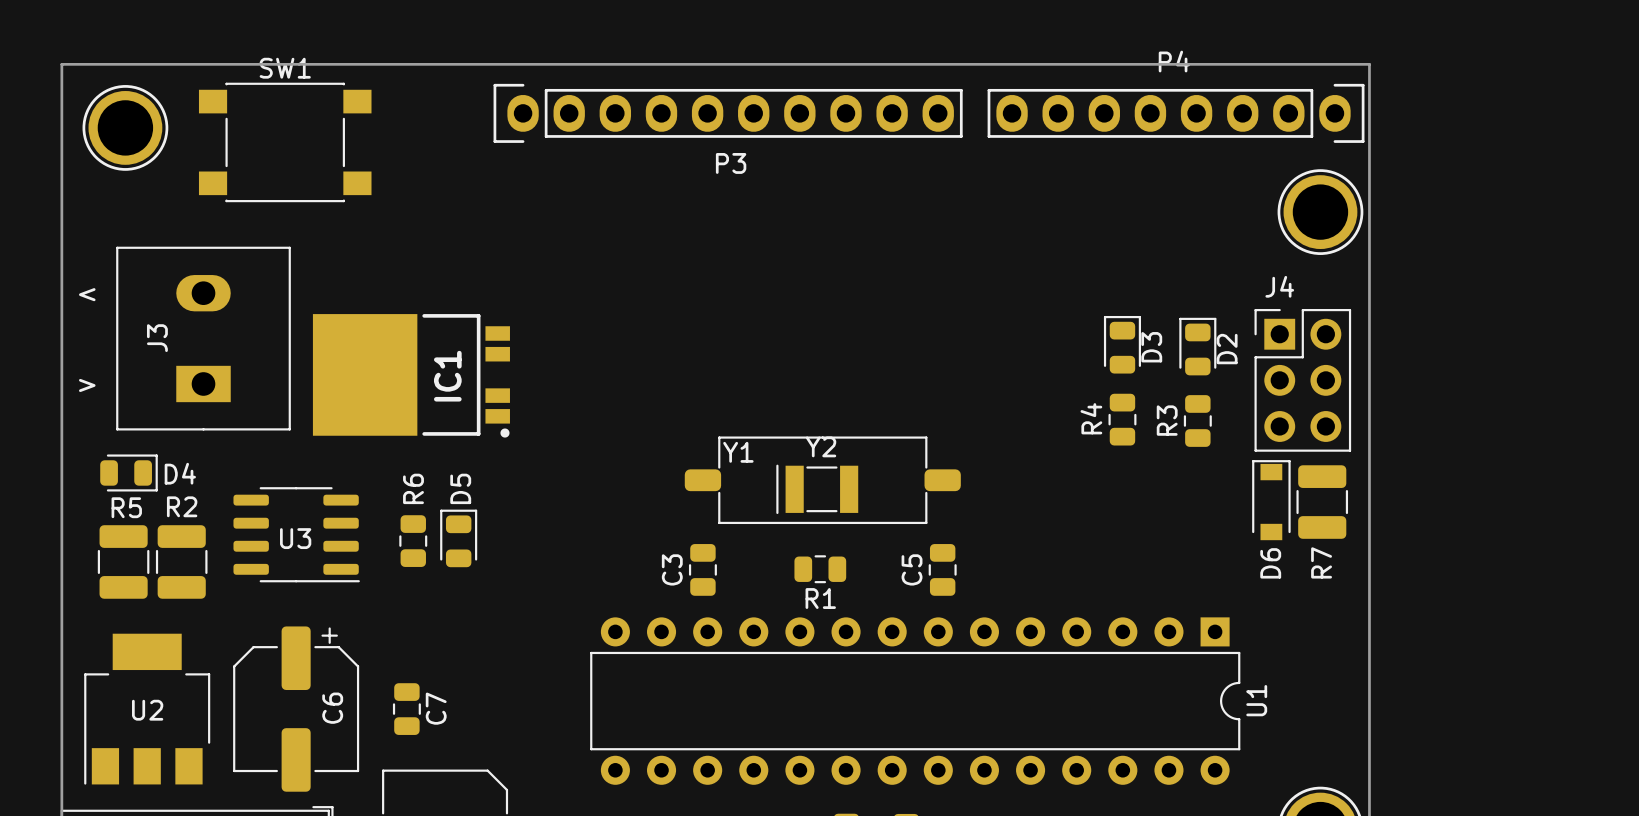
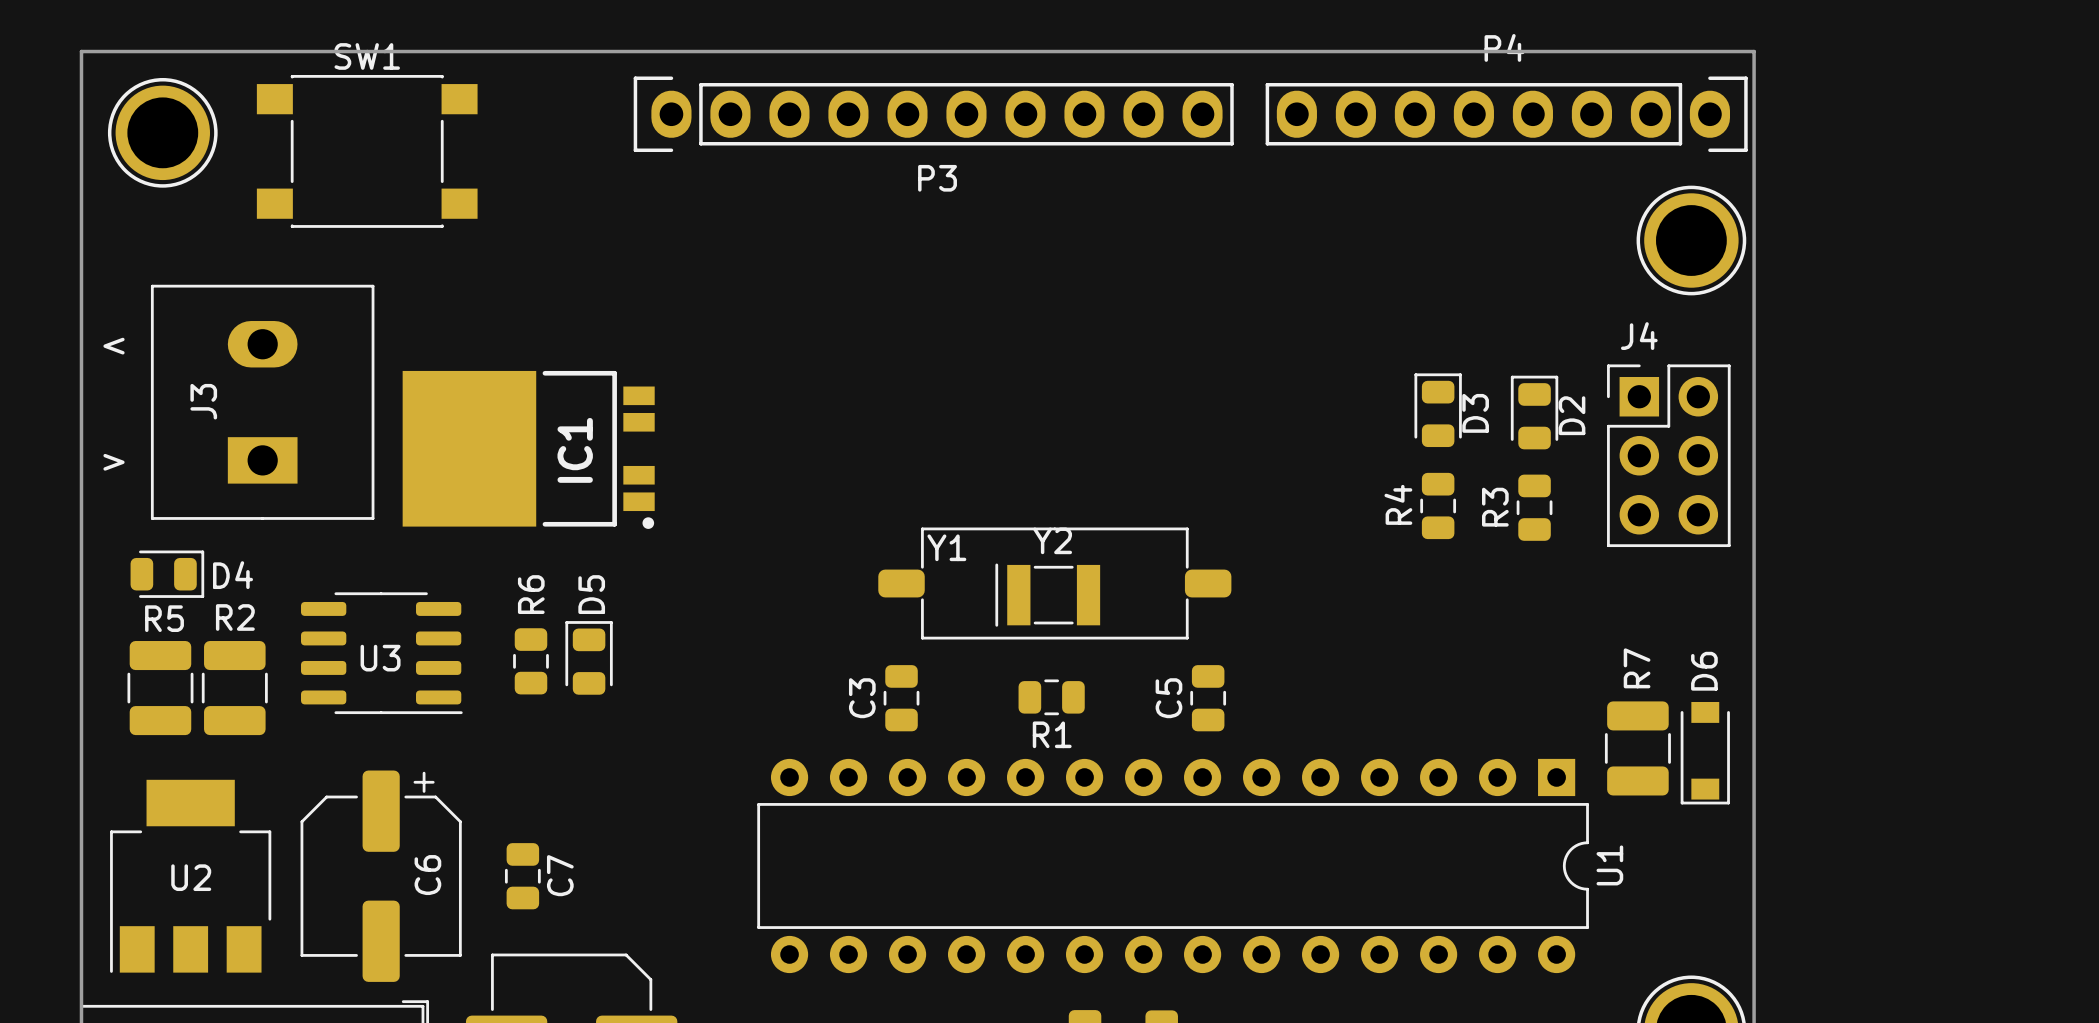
D6 rotation: 0° (1271, 500) -> 180° (1705, 753)
D6 position: (1271, 500) -> (1705, 753)
R7 position: (1322, 502) -> (1637, 748)
R7 name position: R7 (1321, 562) -> R7 (1637, 668)

